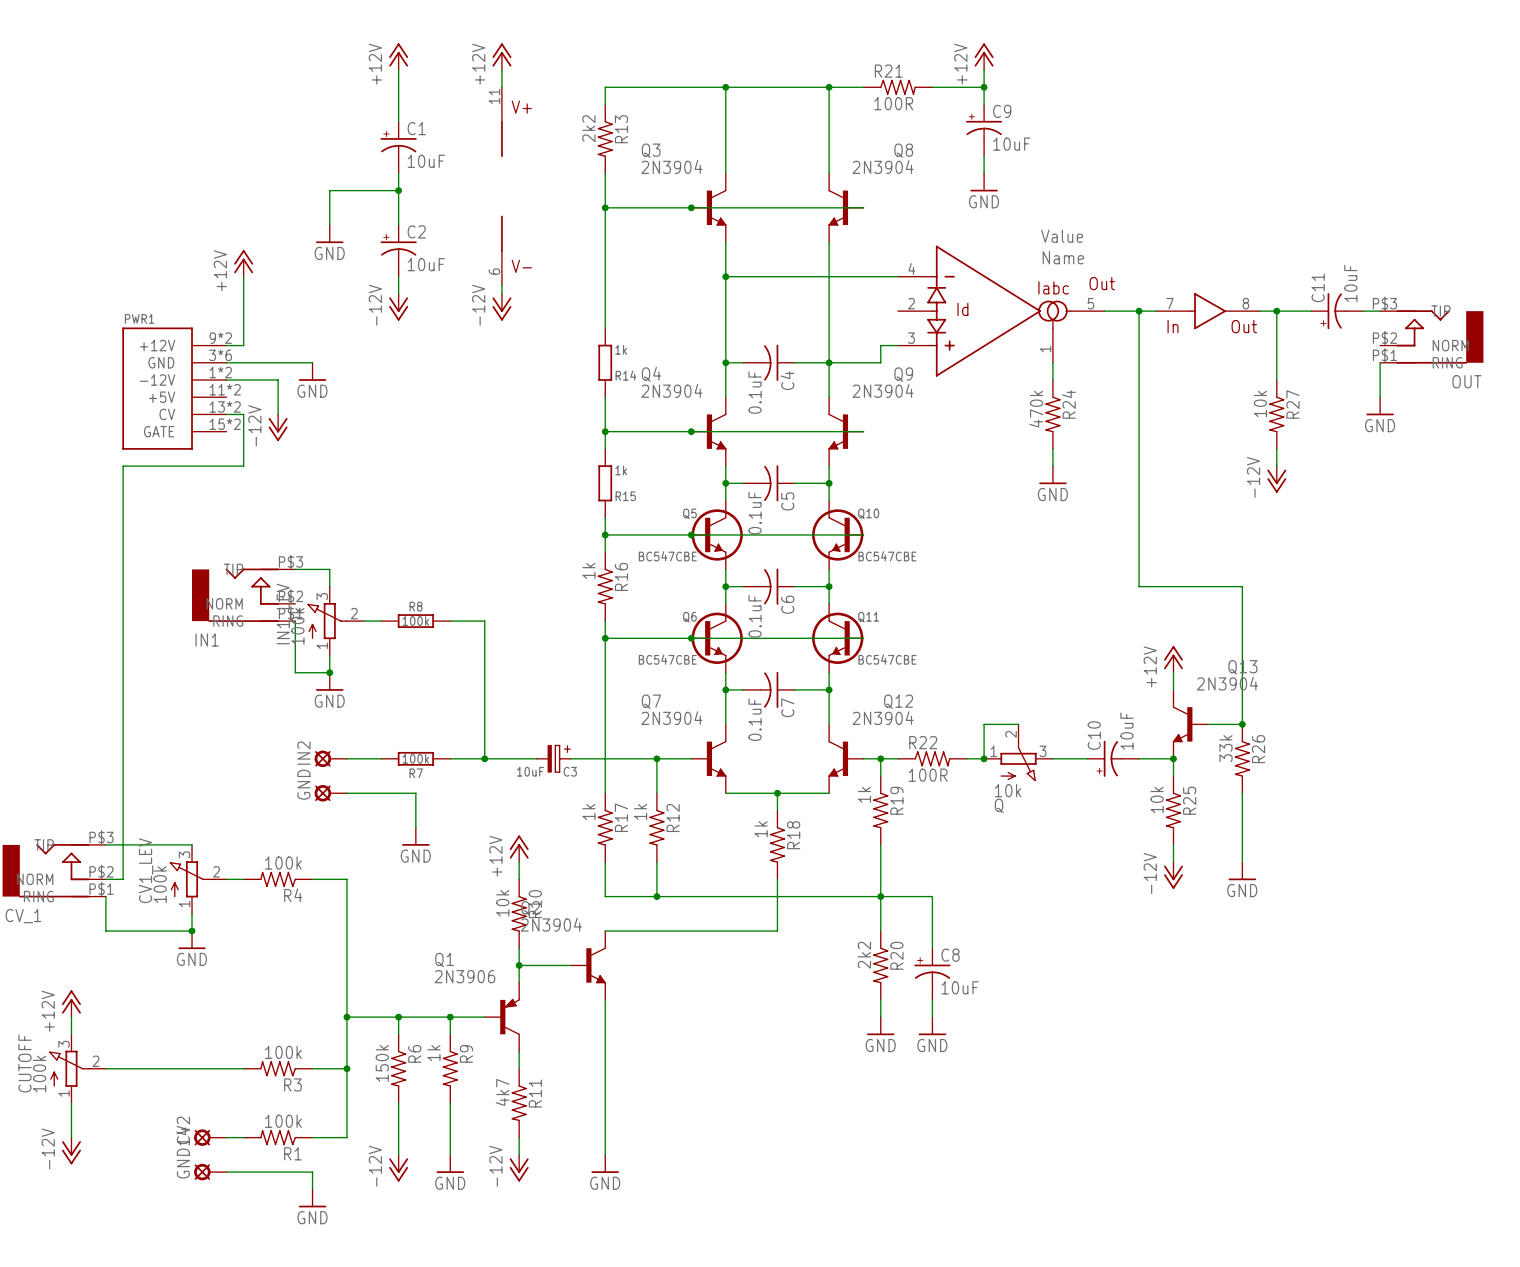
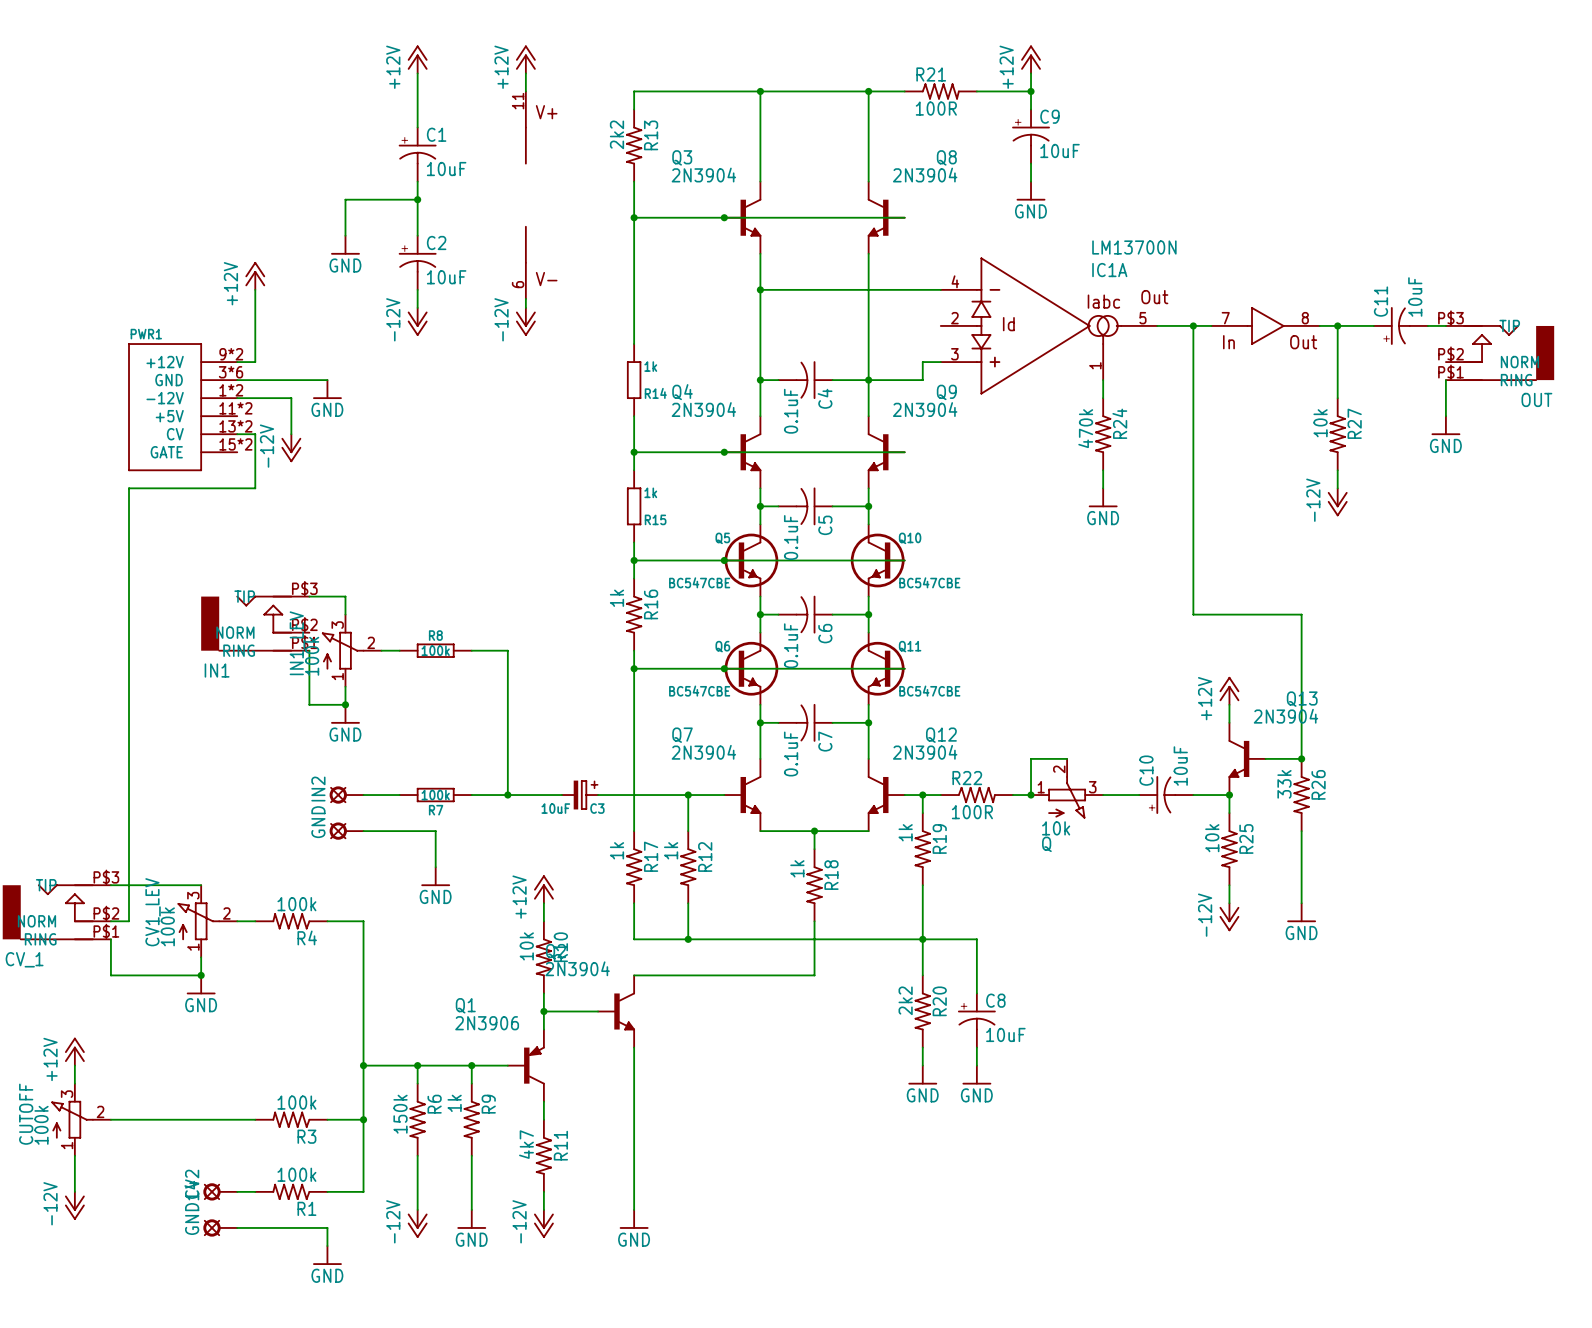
IC1A text: Value (1062, 236) -> none
IC1A value: none -> LM13700N (1134, 247)
IC1A name: none -> IC1A (1109, 270)
IC1A text: Name (1063, 257) -> none

